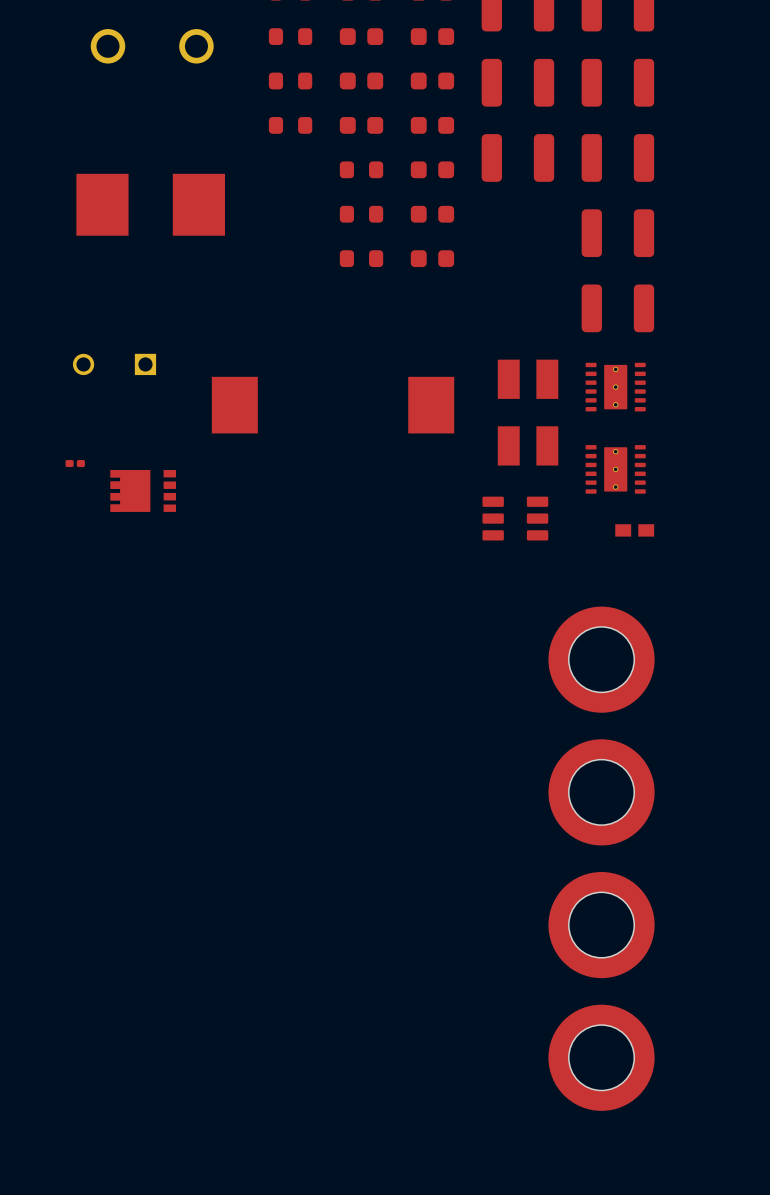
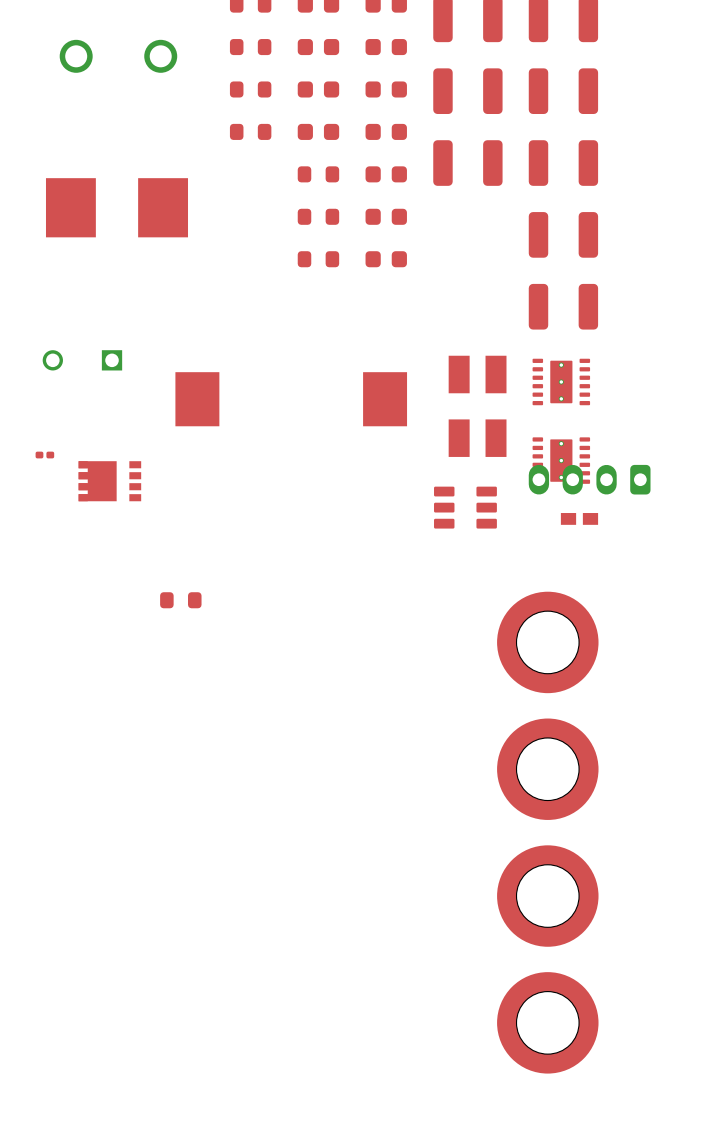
part: none -> (589, 479)
part: none -> (180, 600)

